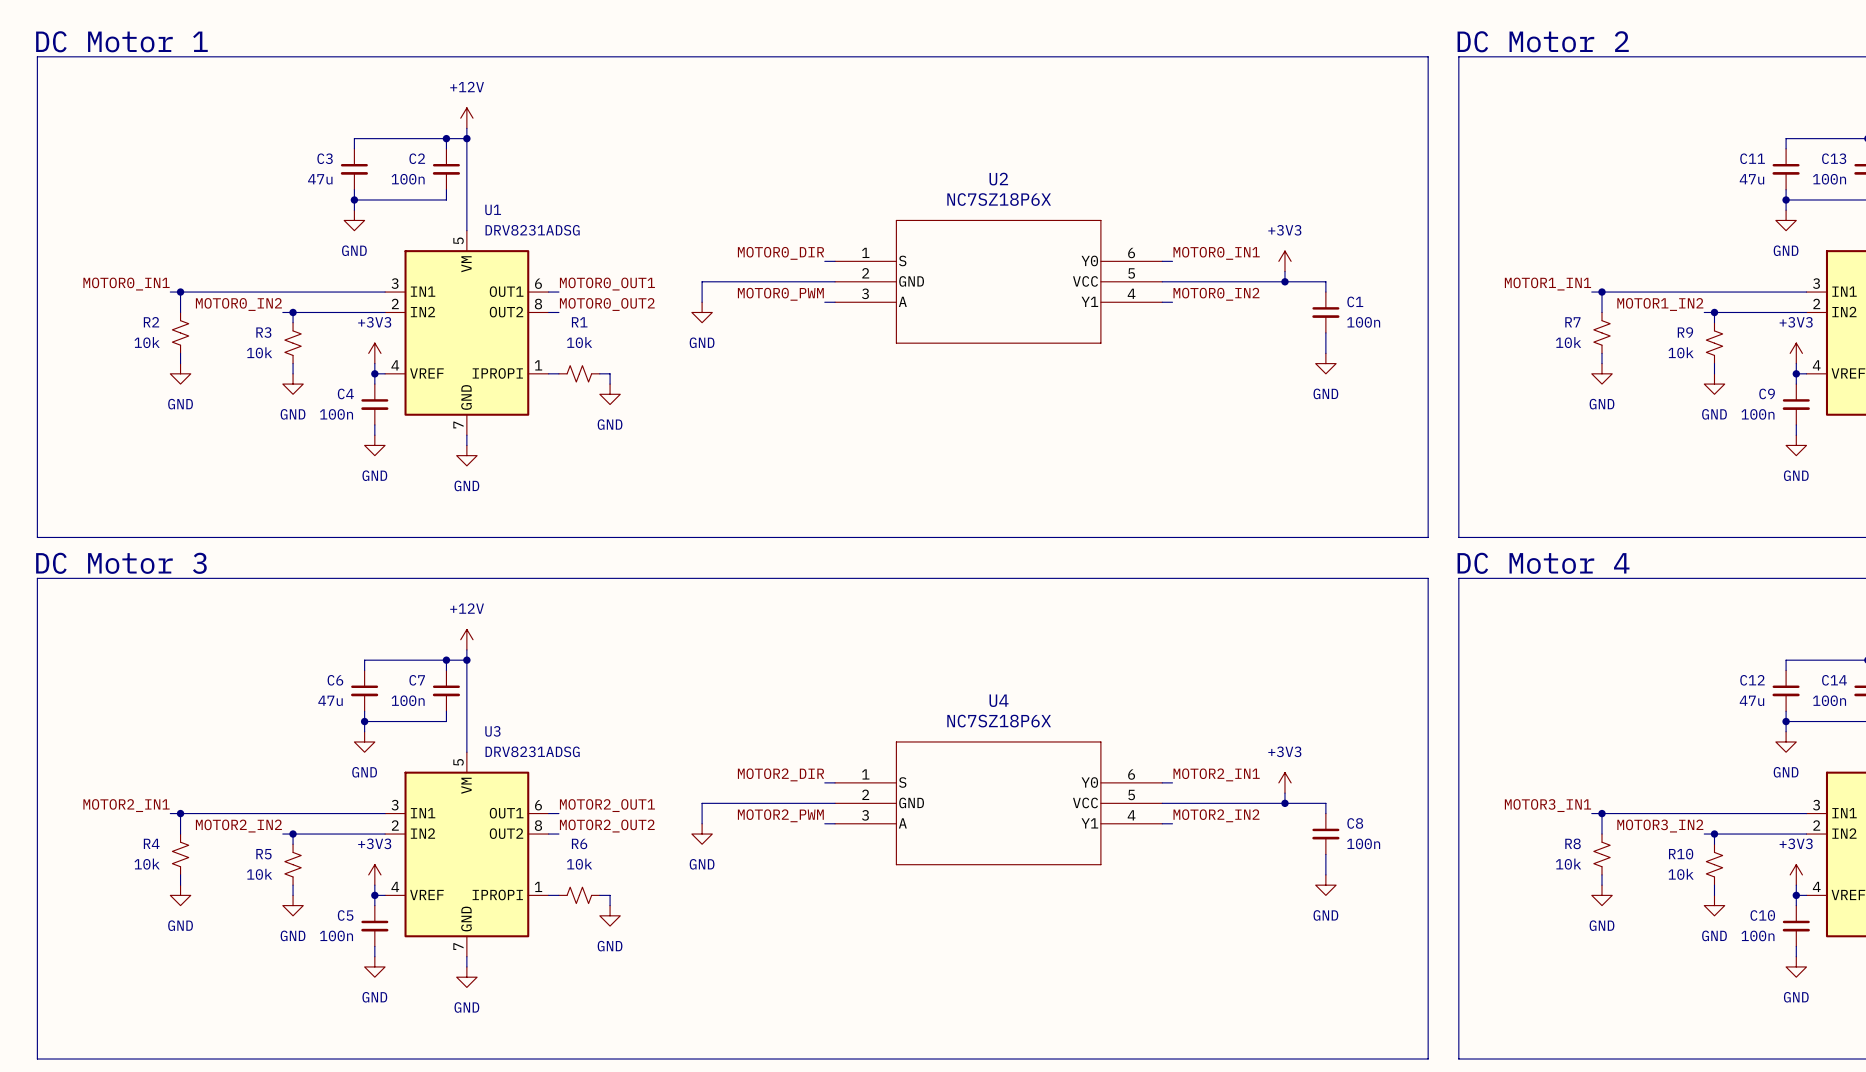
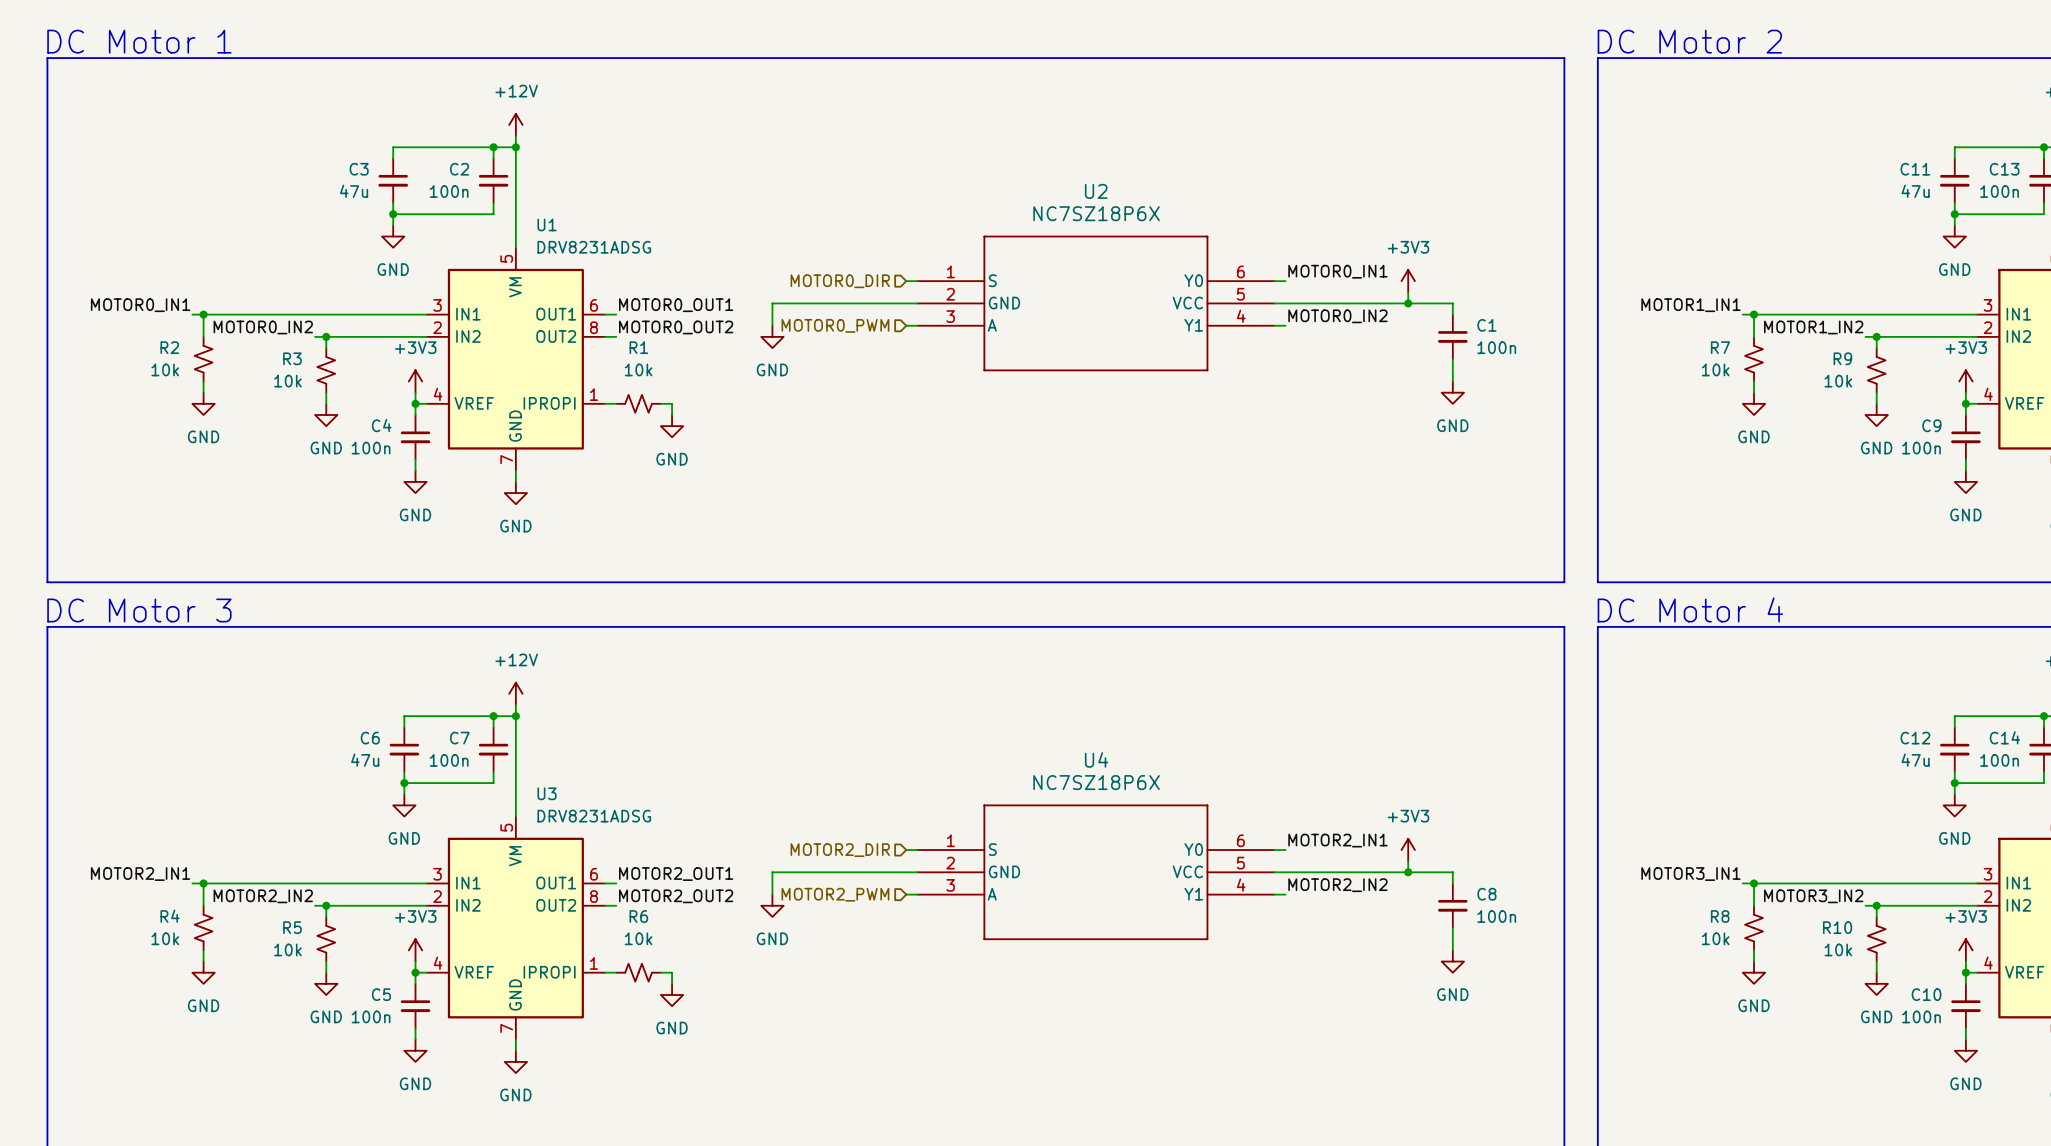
label: MOTOR0_DIR (780, 253) -> none
hierarchical label: none -> MOTOR0_DIR (840, 281)
label: MOTOR0_PWM (780, 294) -> none
hierarchical label: none -> MOTOR0_PWM (835, 325)
label: MOTOR2_DIR (780, 774) -> none
hierarchical label: none -> MOTOR2_DIR (840, 850)
label: MOTOR2_PWM (780, 815) -> none
hierarchical label: none -> MOTOR2_PWM (835, 894)

